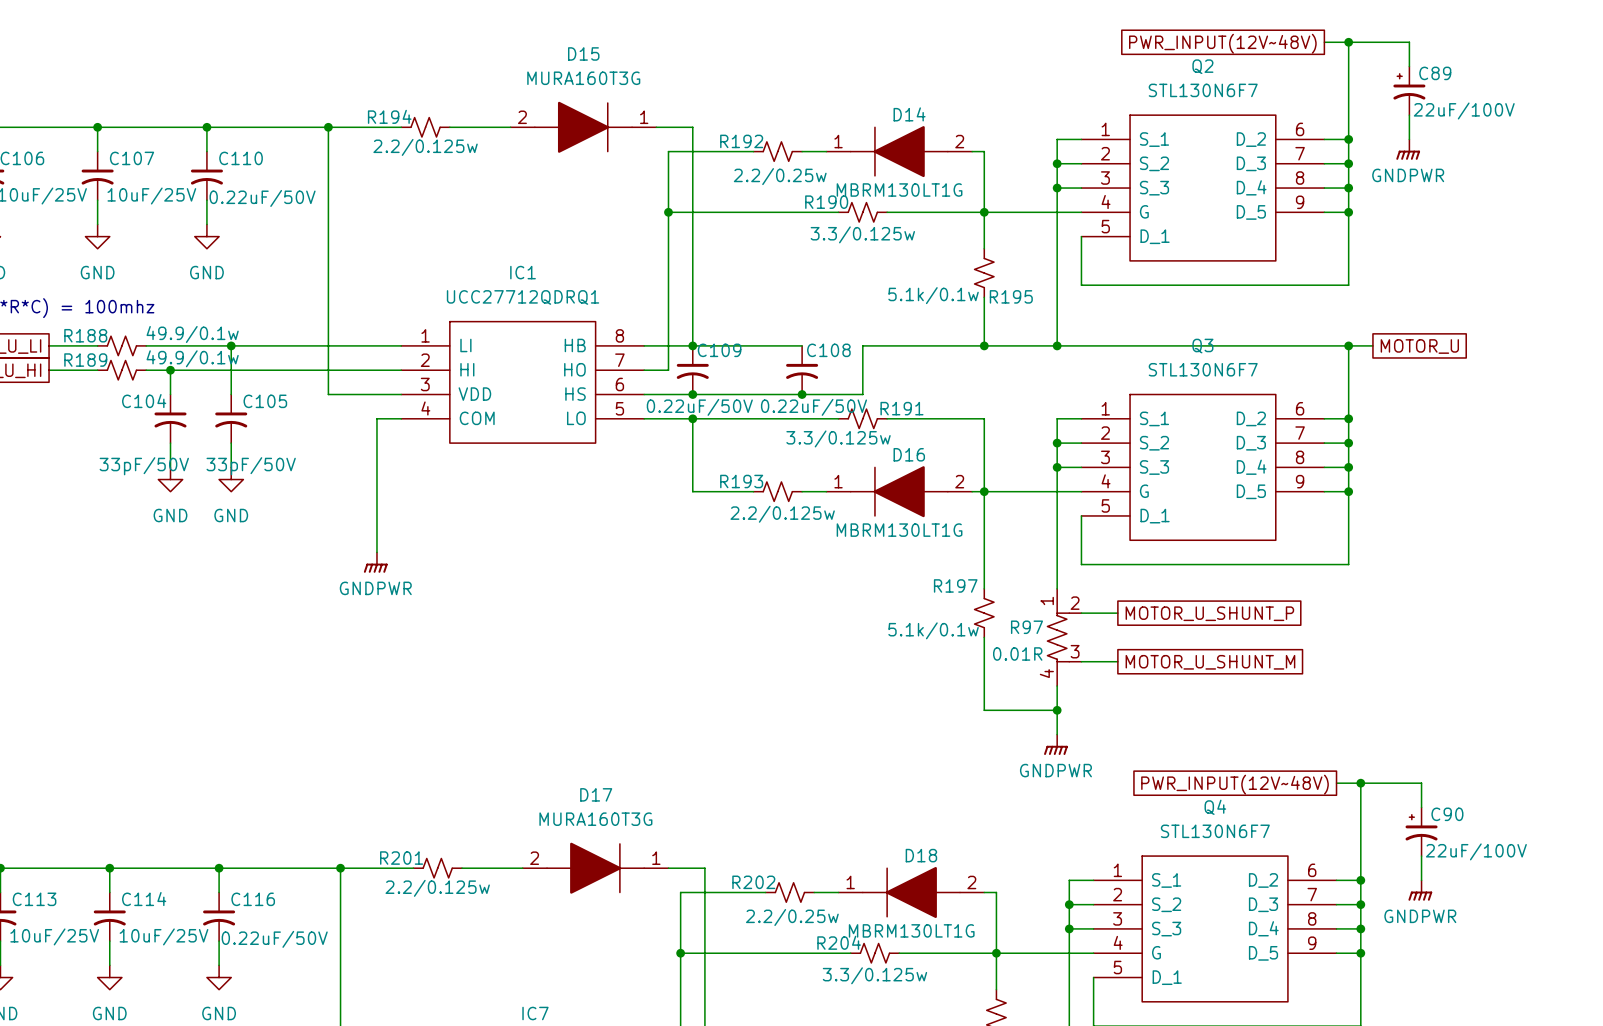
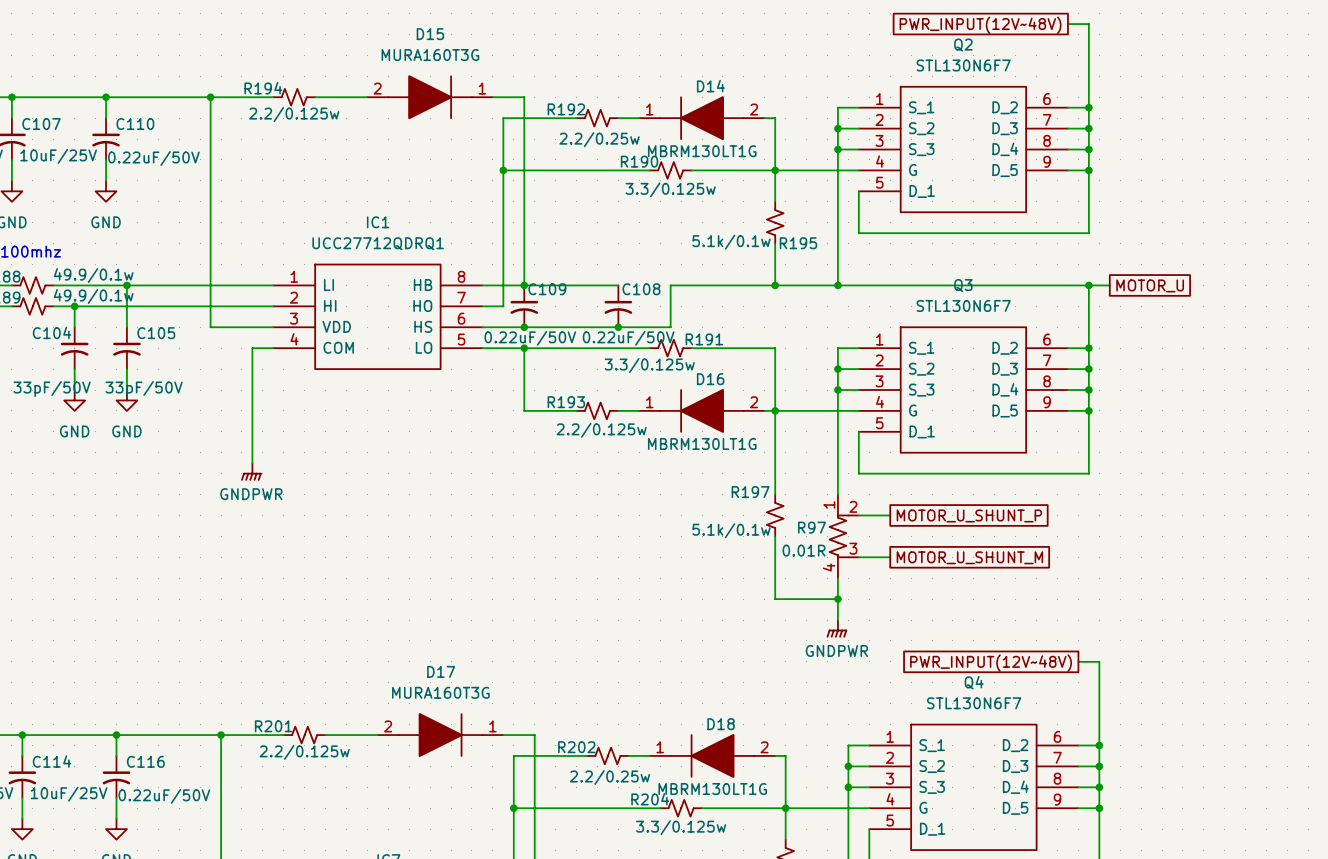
wire: (1348, 42) (1409, 42) (1409, 66) -> none
junction: (1348, 42) -> none
C89: 22uF/100V (1409, 90) -> none
wire: (1409, 115) (1409, 139) -> none
power symbol: GNDPWR (1408, 149) -> none
wire: (1360, 783) (1421, 783) (1421, 807) -> none
junction: (1360, 783) -> none
C90: 22uF/100V (1421, 831) -> none
wire: (1421, 856) (1421, 880) -> none
power symbol: GNDPWR (1420, 890) -> none

